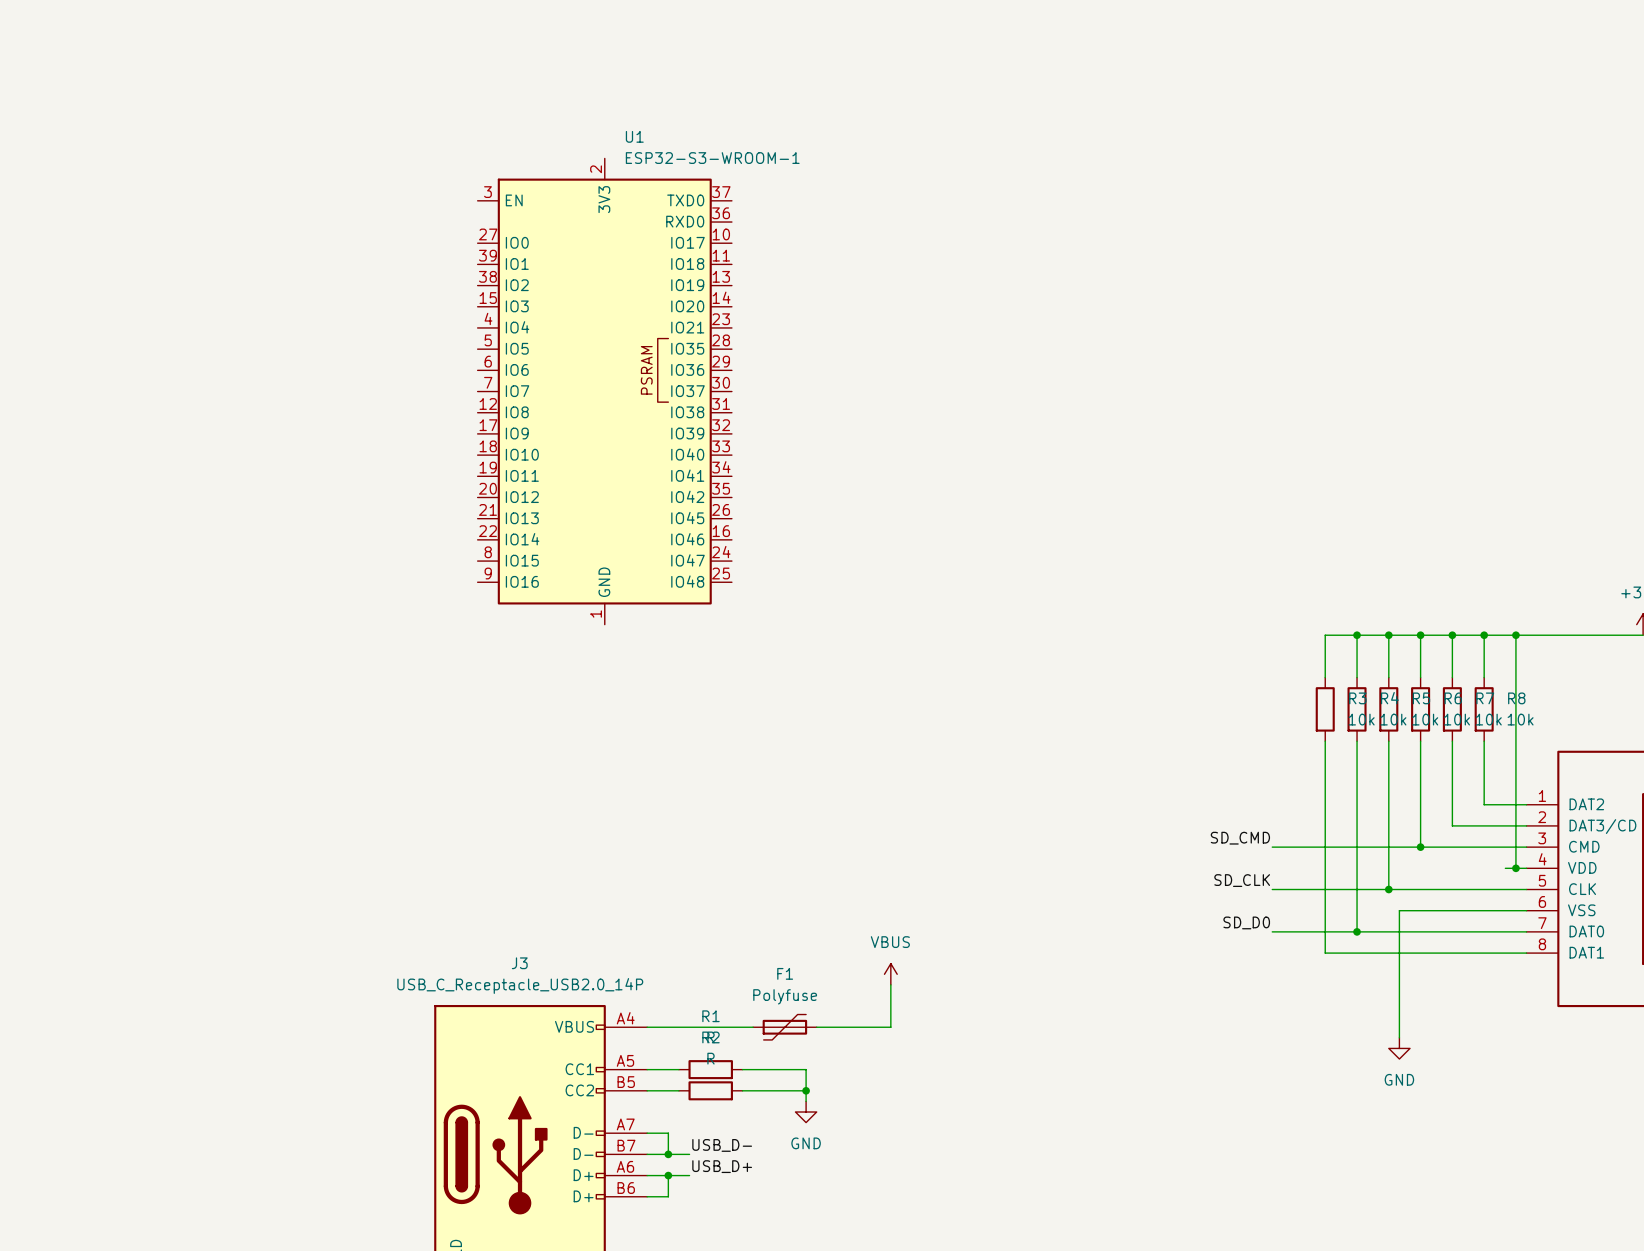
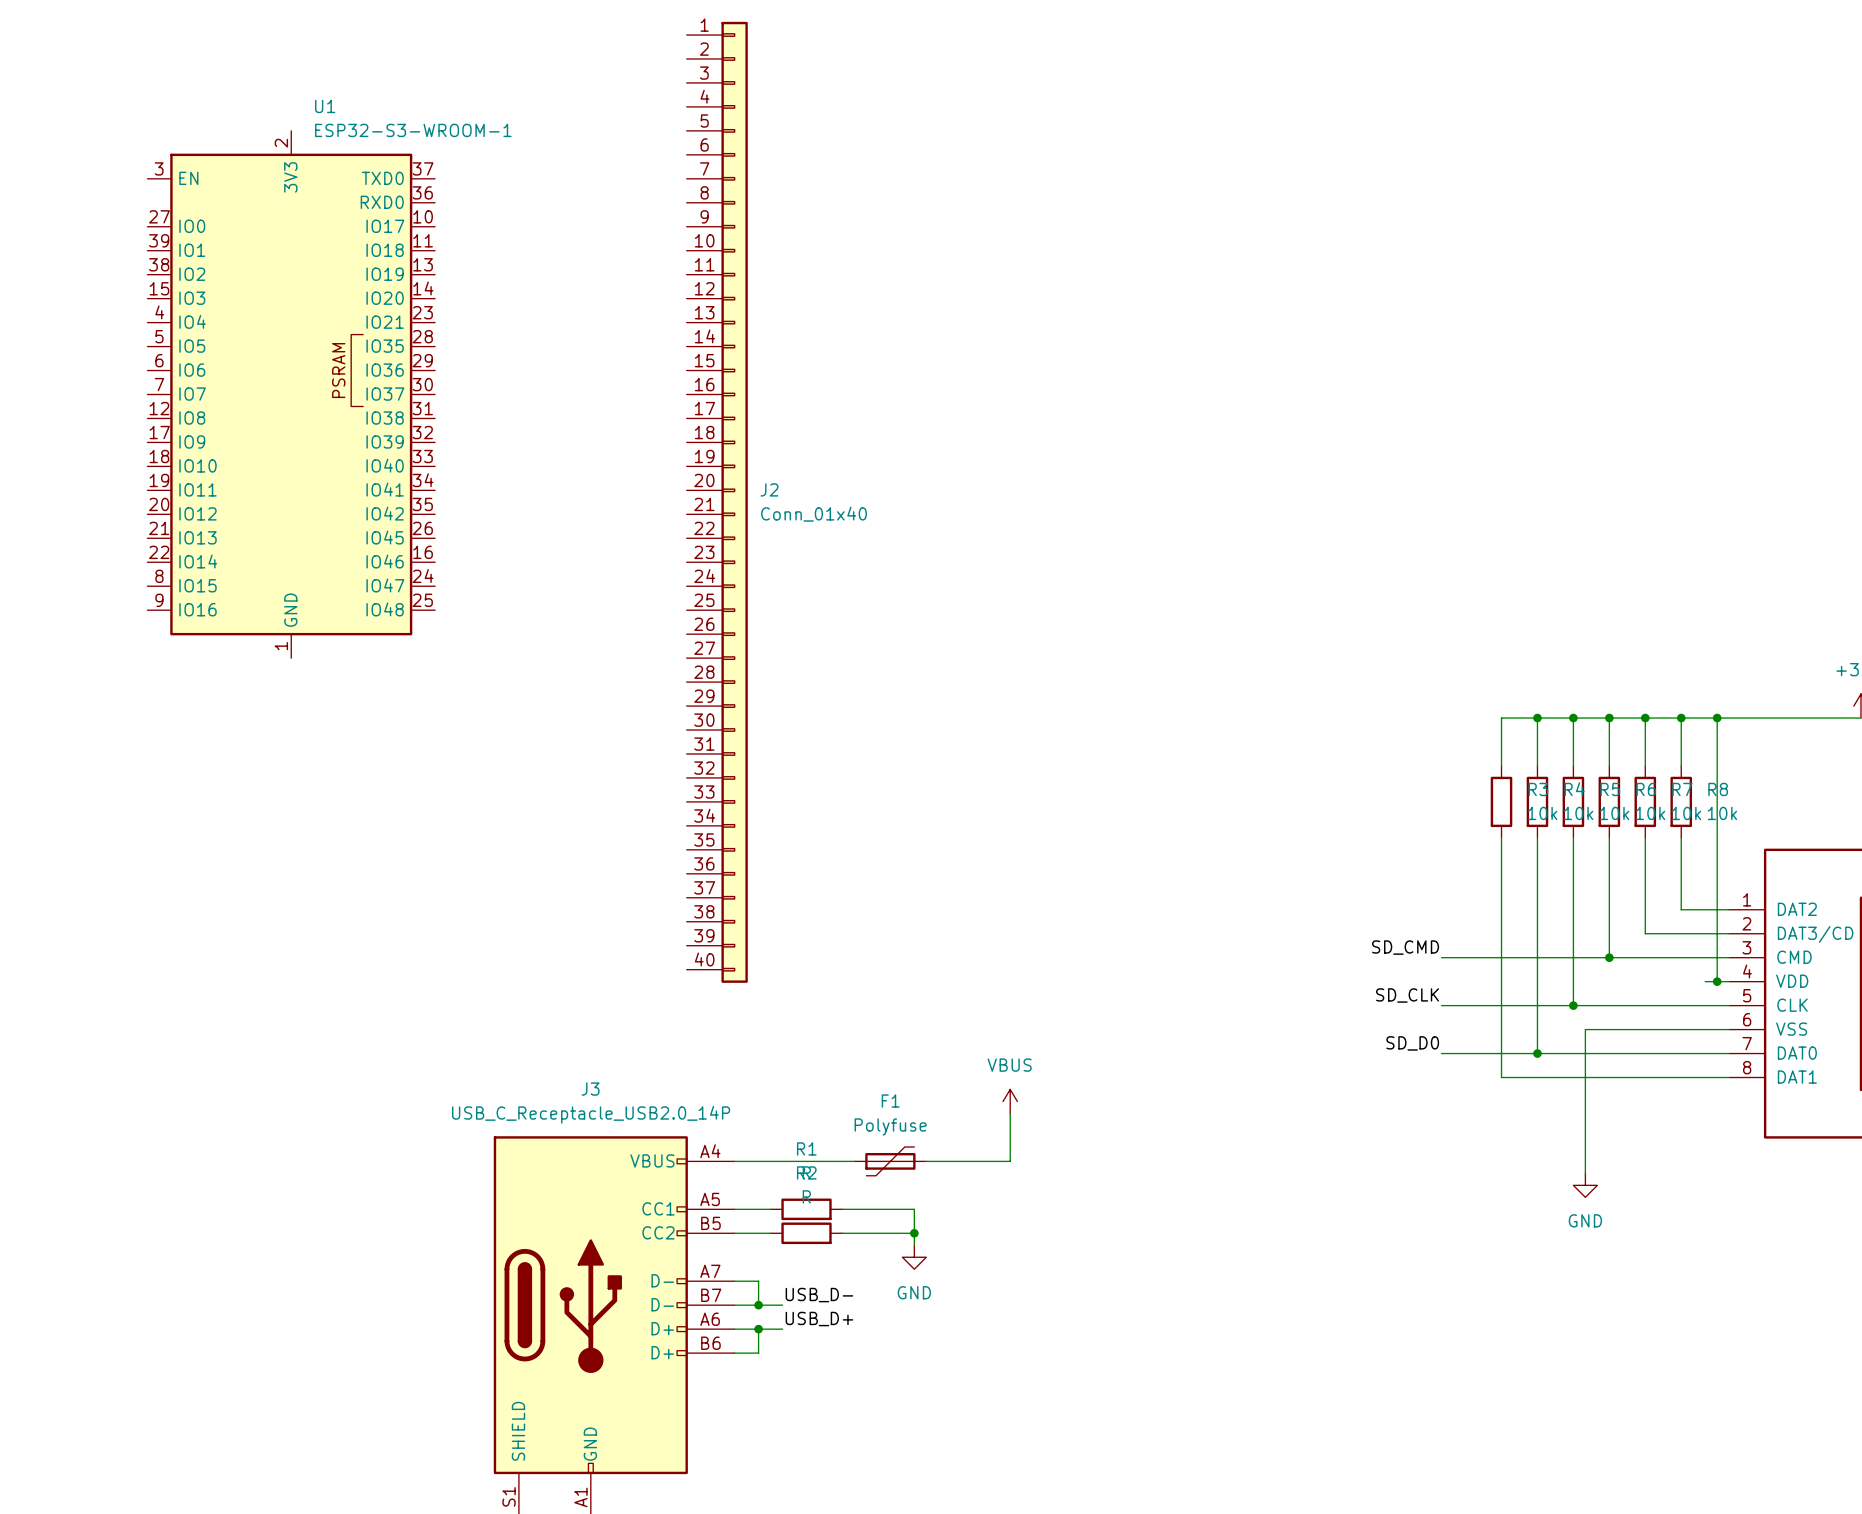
U1 position: (604, 391) -> (291, 394)
J2: none -> Conn_01x40 (717, 502)

